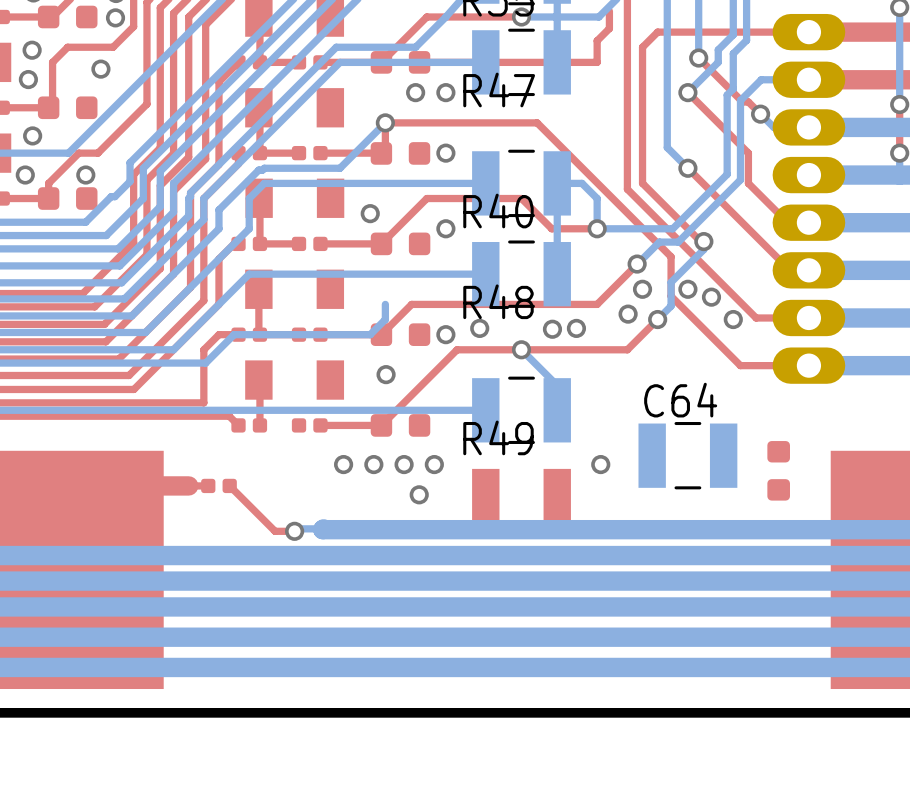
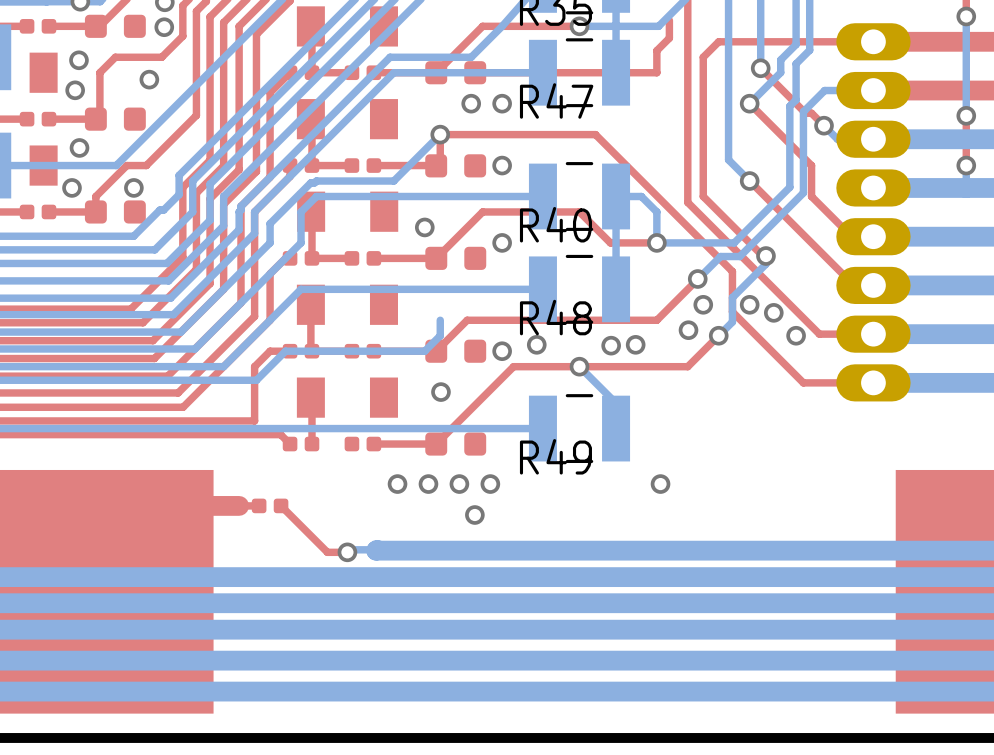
C64: (687, 455) -> none
part: (778, 470) -> none
part: (521, 501) -> none

